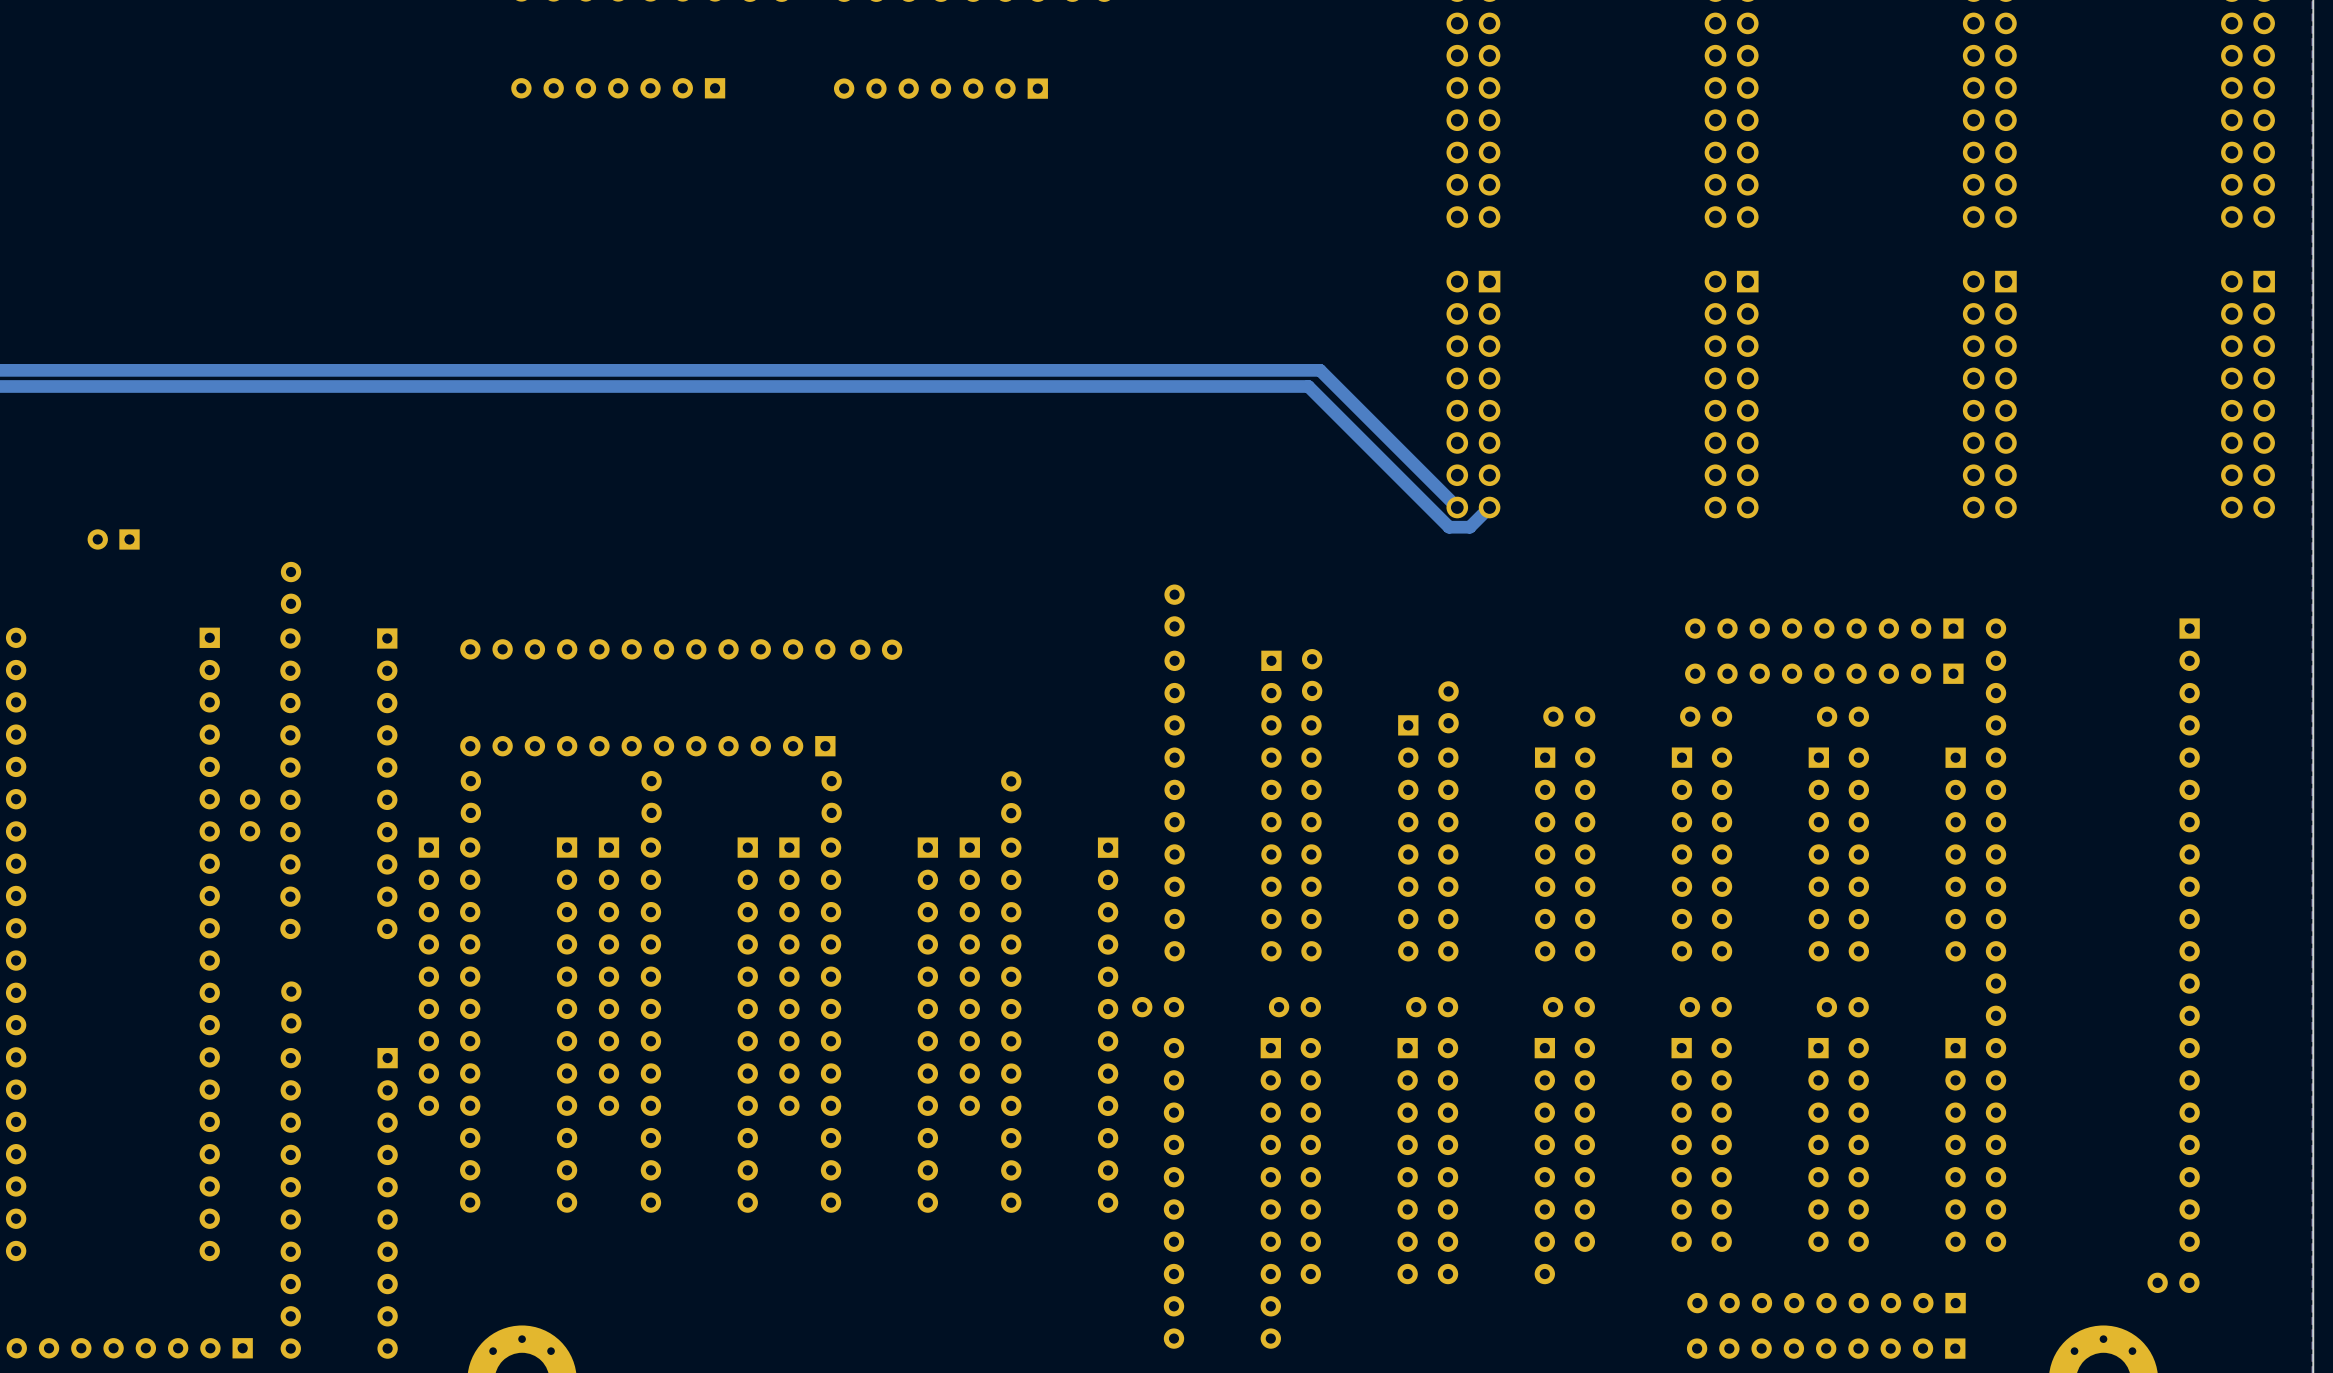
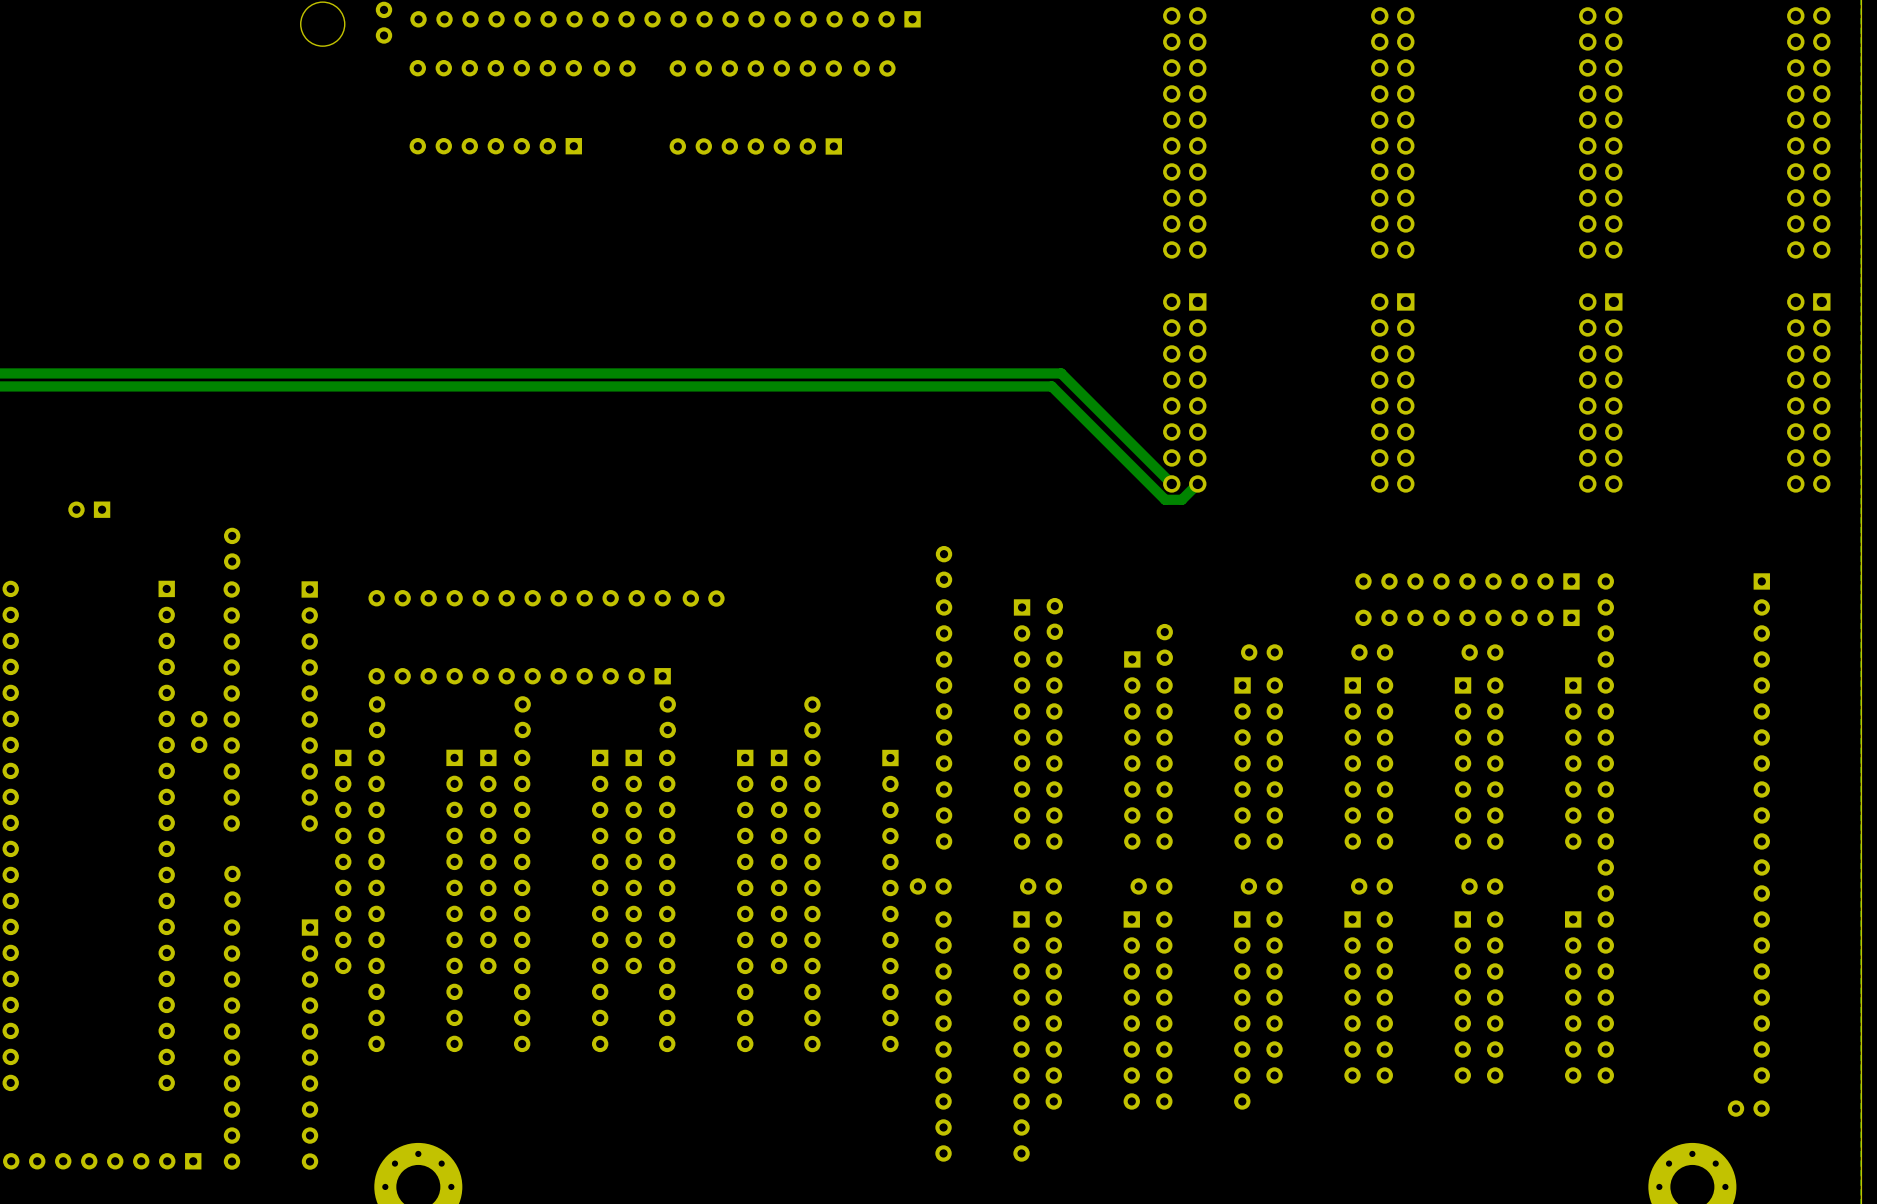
part: (1826, 1303) -> none
part: (1826, 1348) -> none

